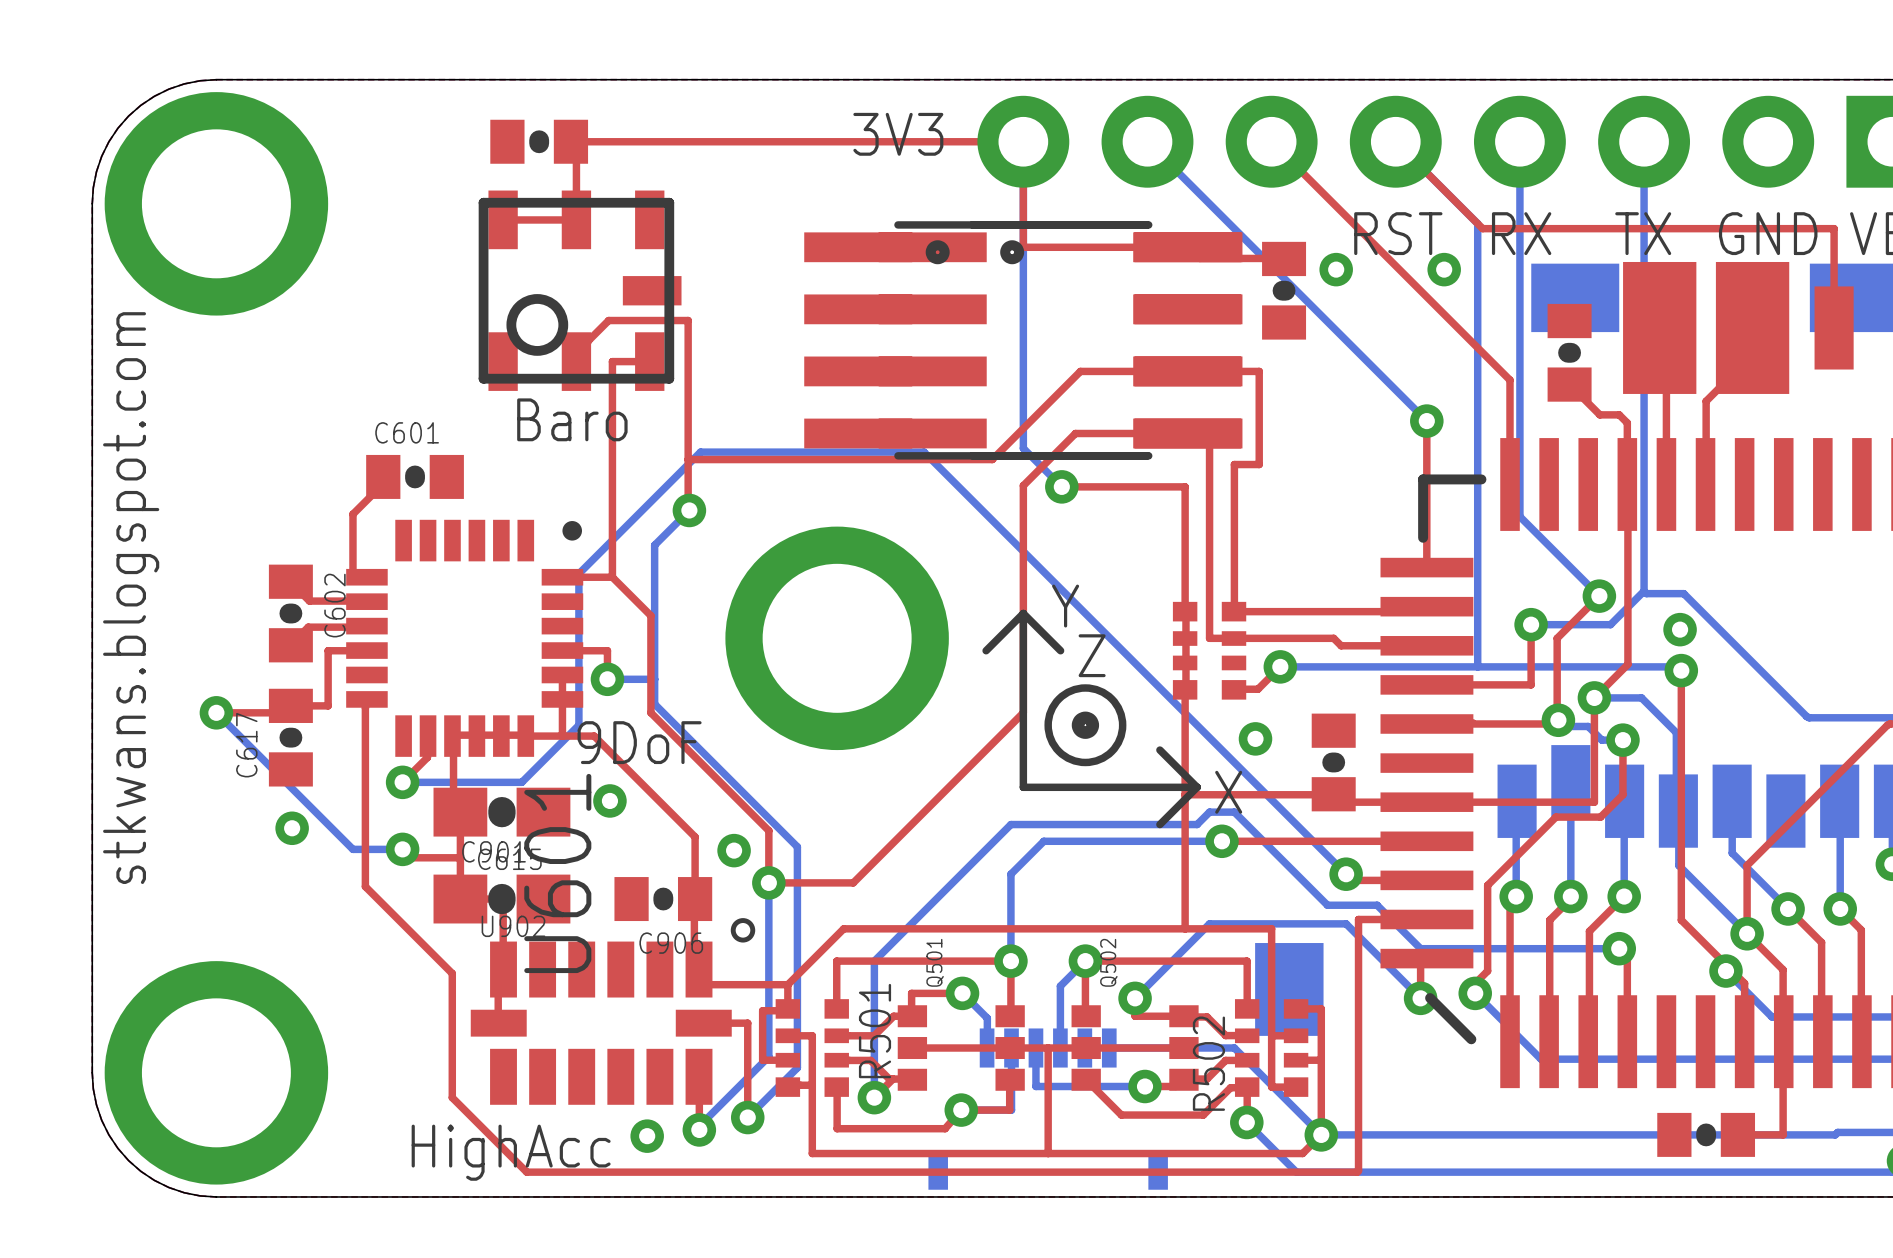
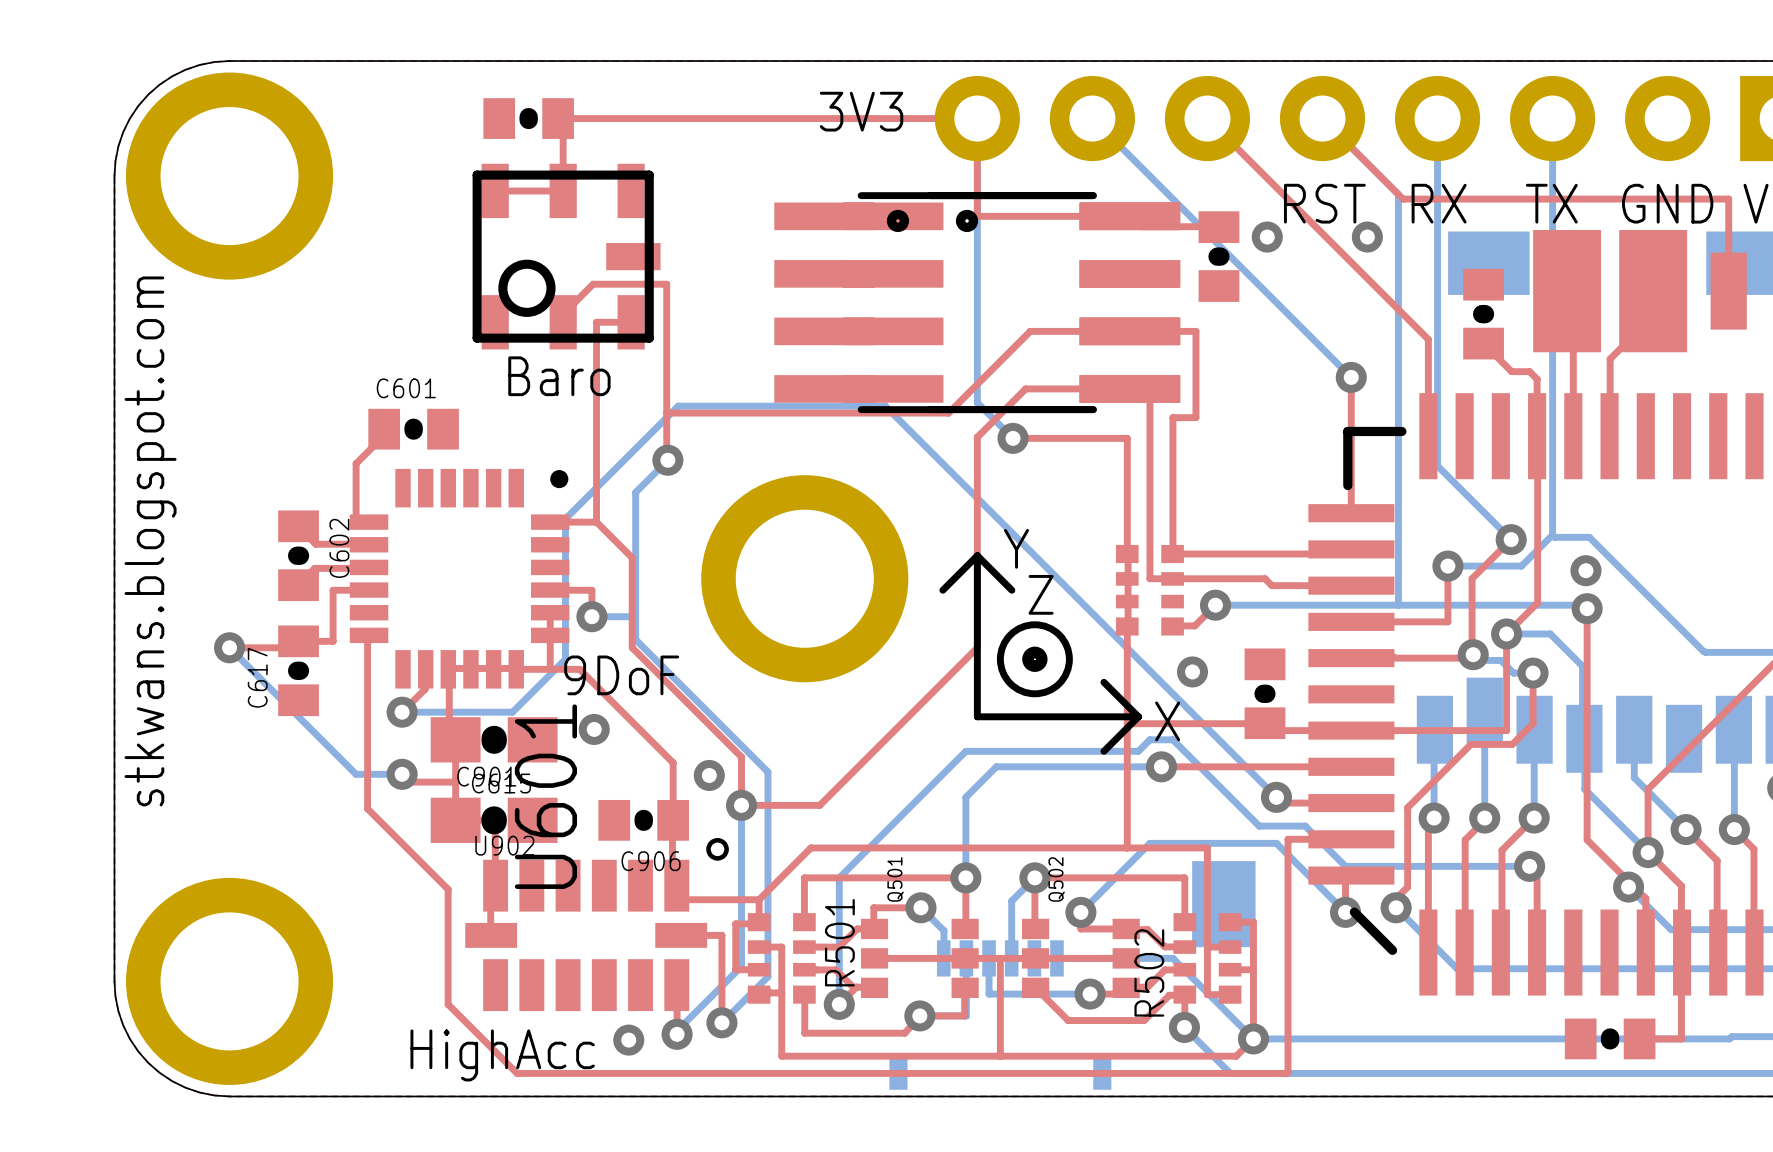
via: (292, 828) -> none

